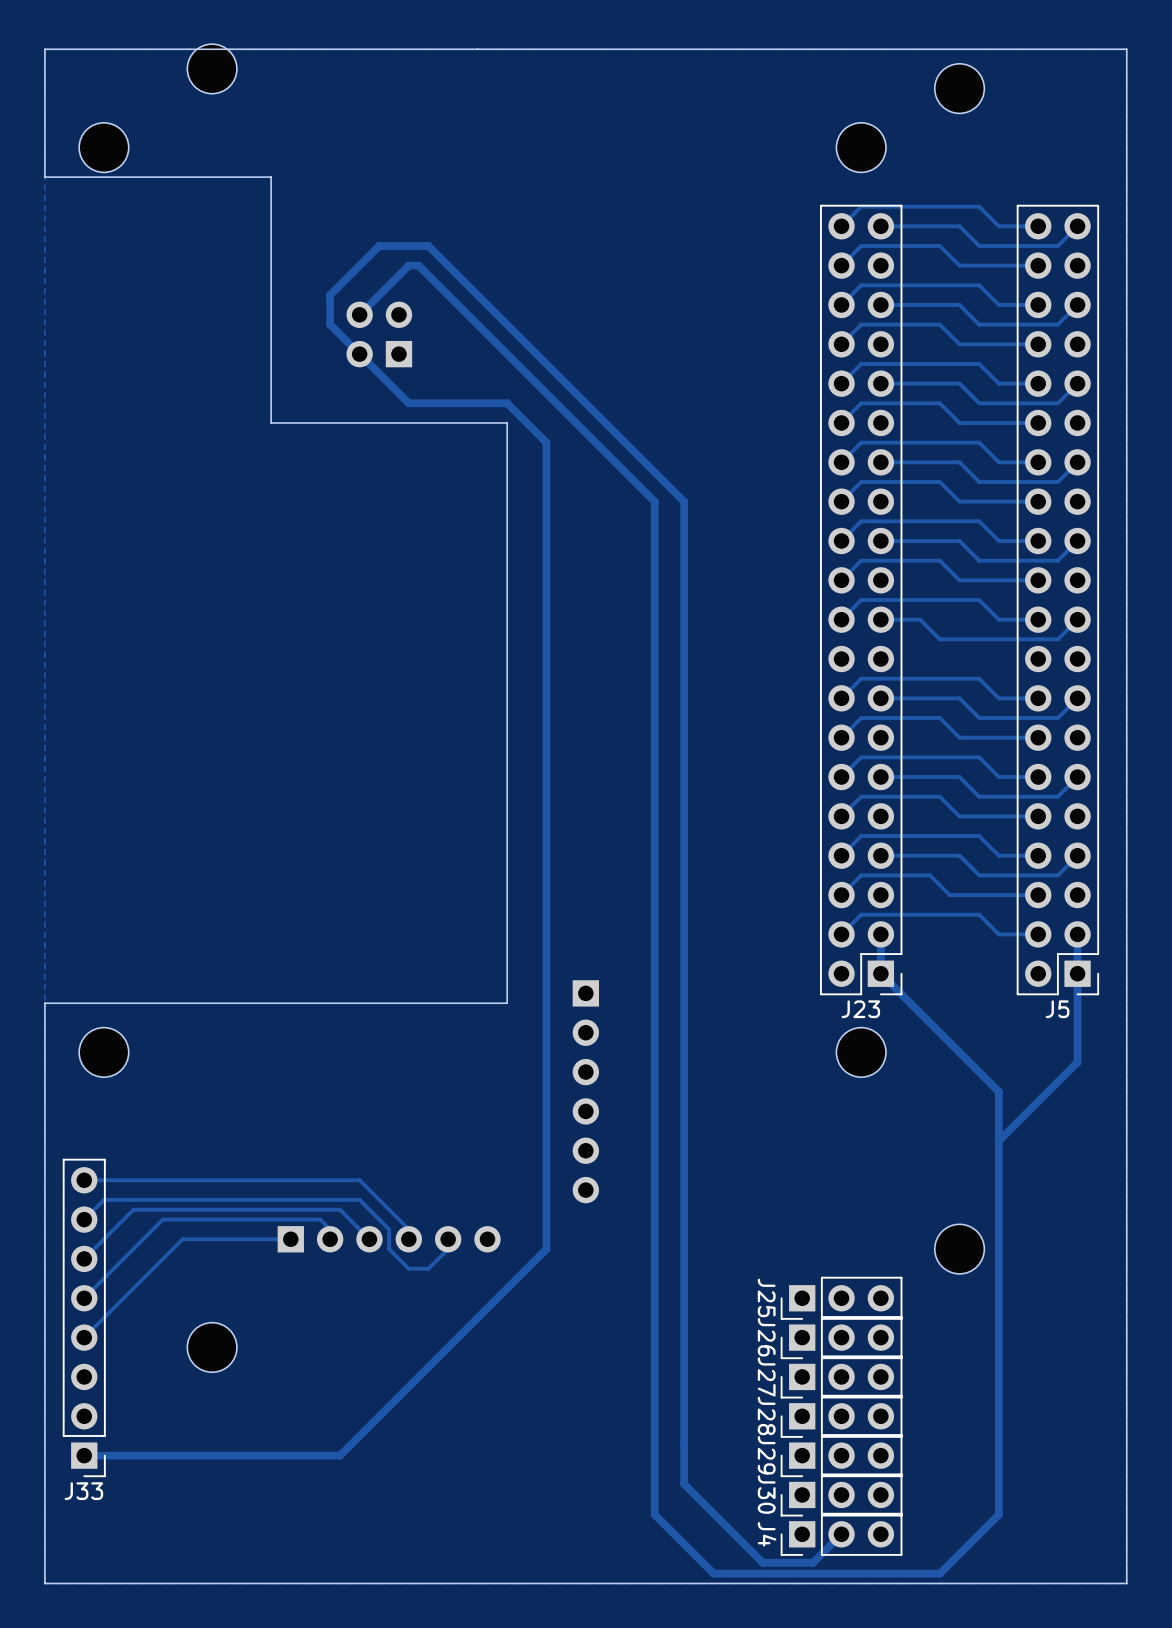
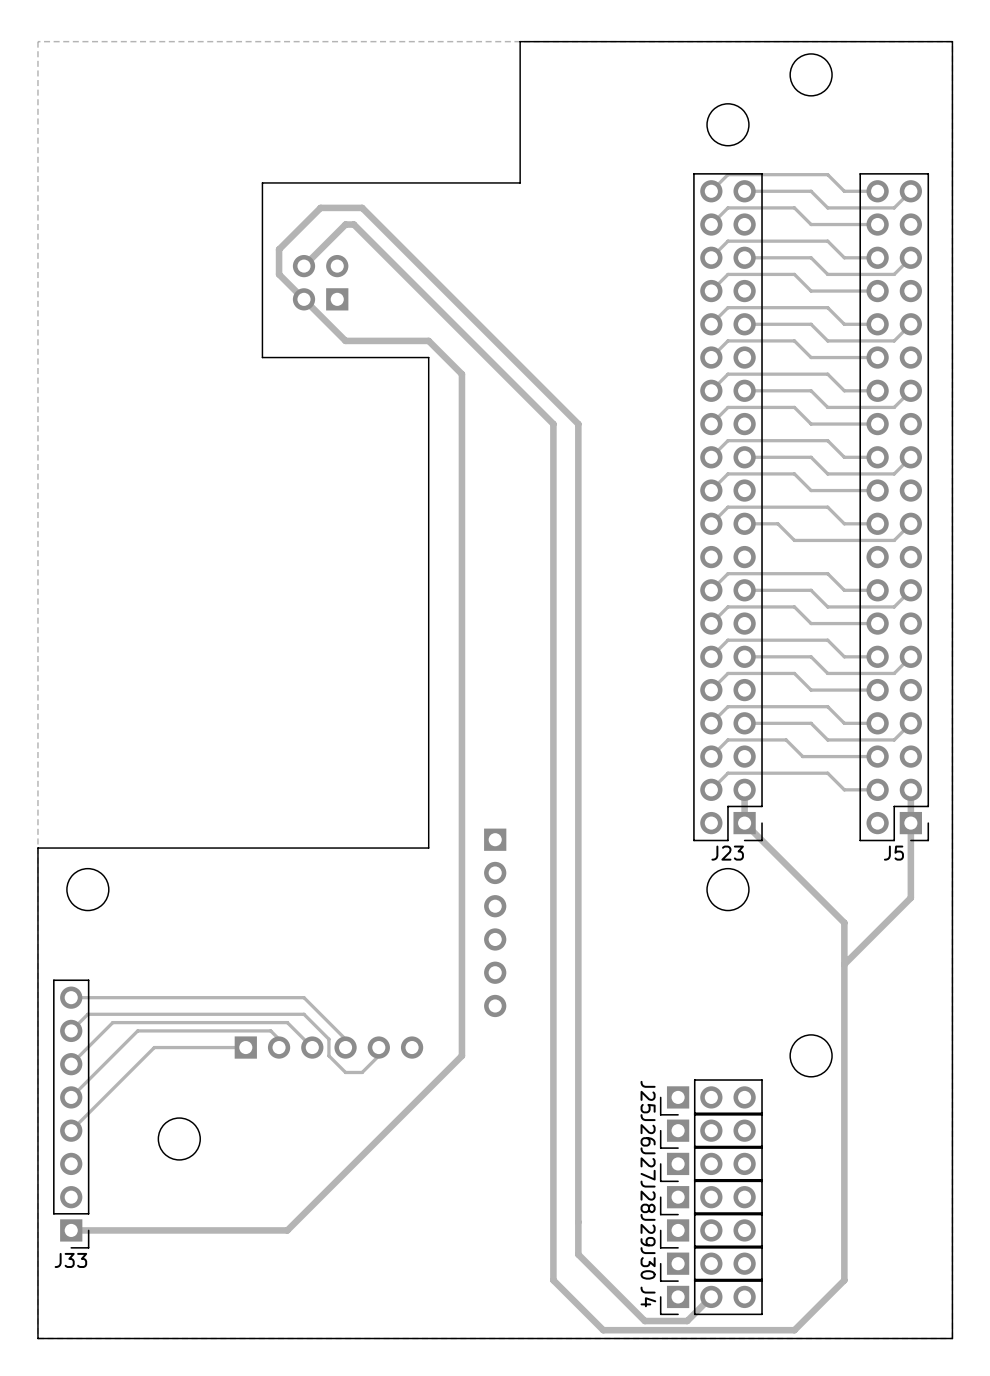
board edge: (615, 49) (44, 49) (44, 177) (271, 177) (271, 422) (310, 422) -> (520, 41) (520, 182) (262, 182) (262, 357)
part: (212, 68) -> none
part: (103, 147) -> none

